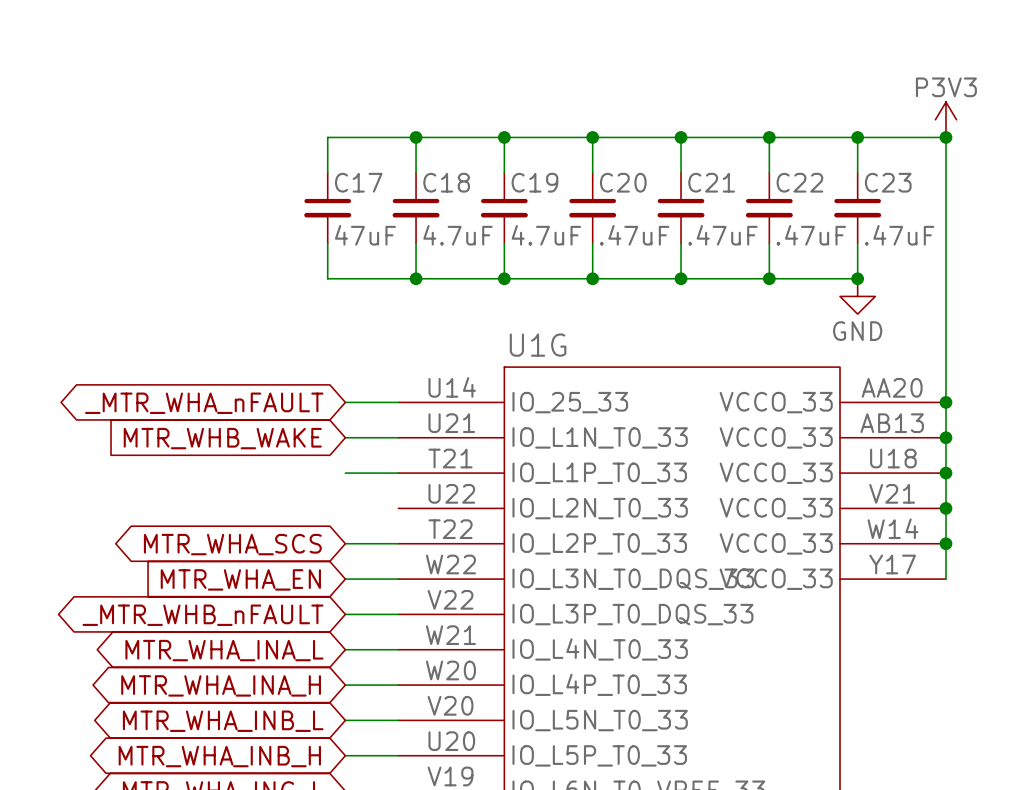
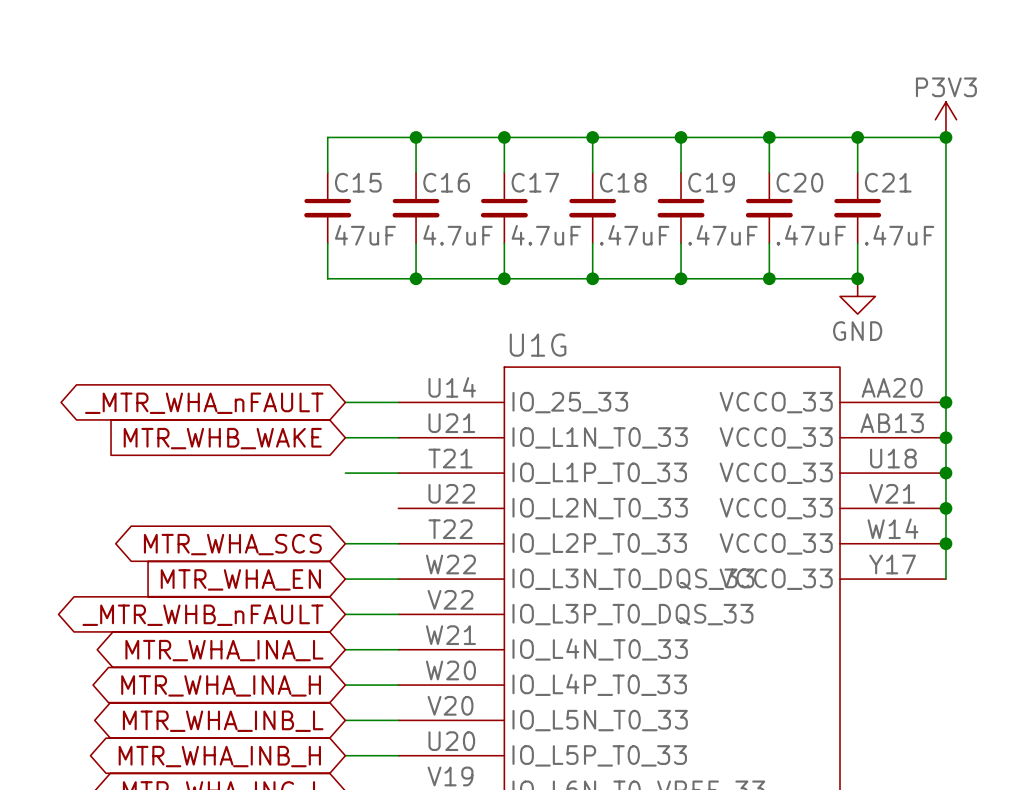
C17 name: C17 (358, 182) -> C15 (358, 182)
C18 name: C18 (446, 182) -> C16 (446, 182)
C19 name: C19 (534, 182) -> C17 (535, 182)
C20 name: C20 (623, 182) -> C18 (623, 182)
C21 name: C21 (711, 182) -> C19 (711, 182)
C22 name: C22 (799, 182) -> C20 (799, 182)
C23 name: C23 (888, 182) -> C21 (888, 182)

